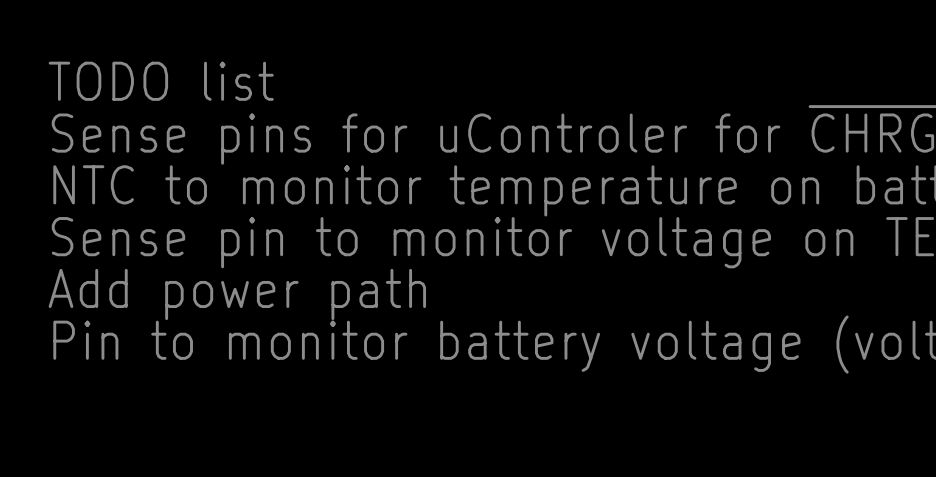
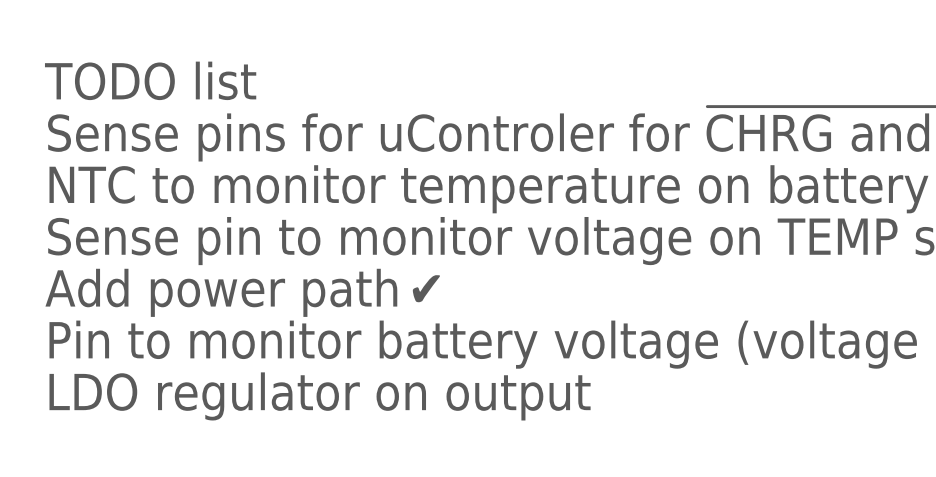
text: none -> ✔ (426, 288)
text: none -> LDO regulator on output (320, 396)

